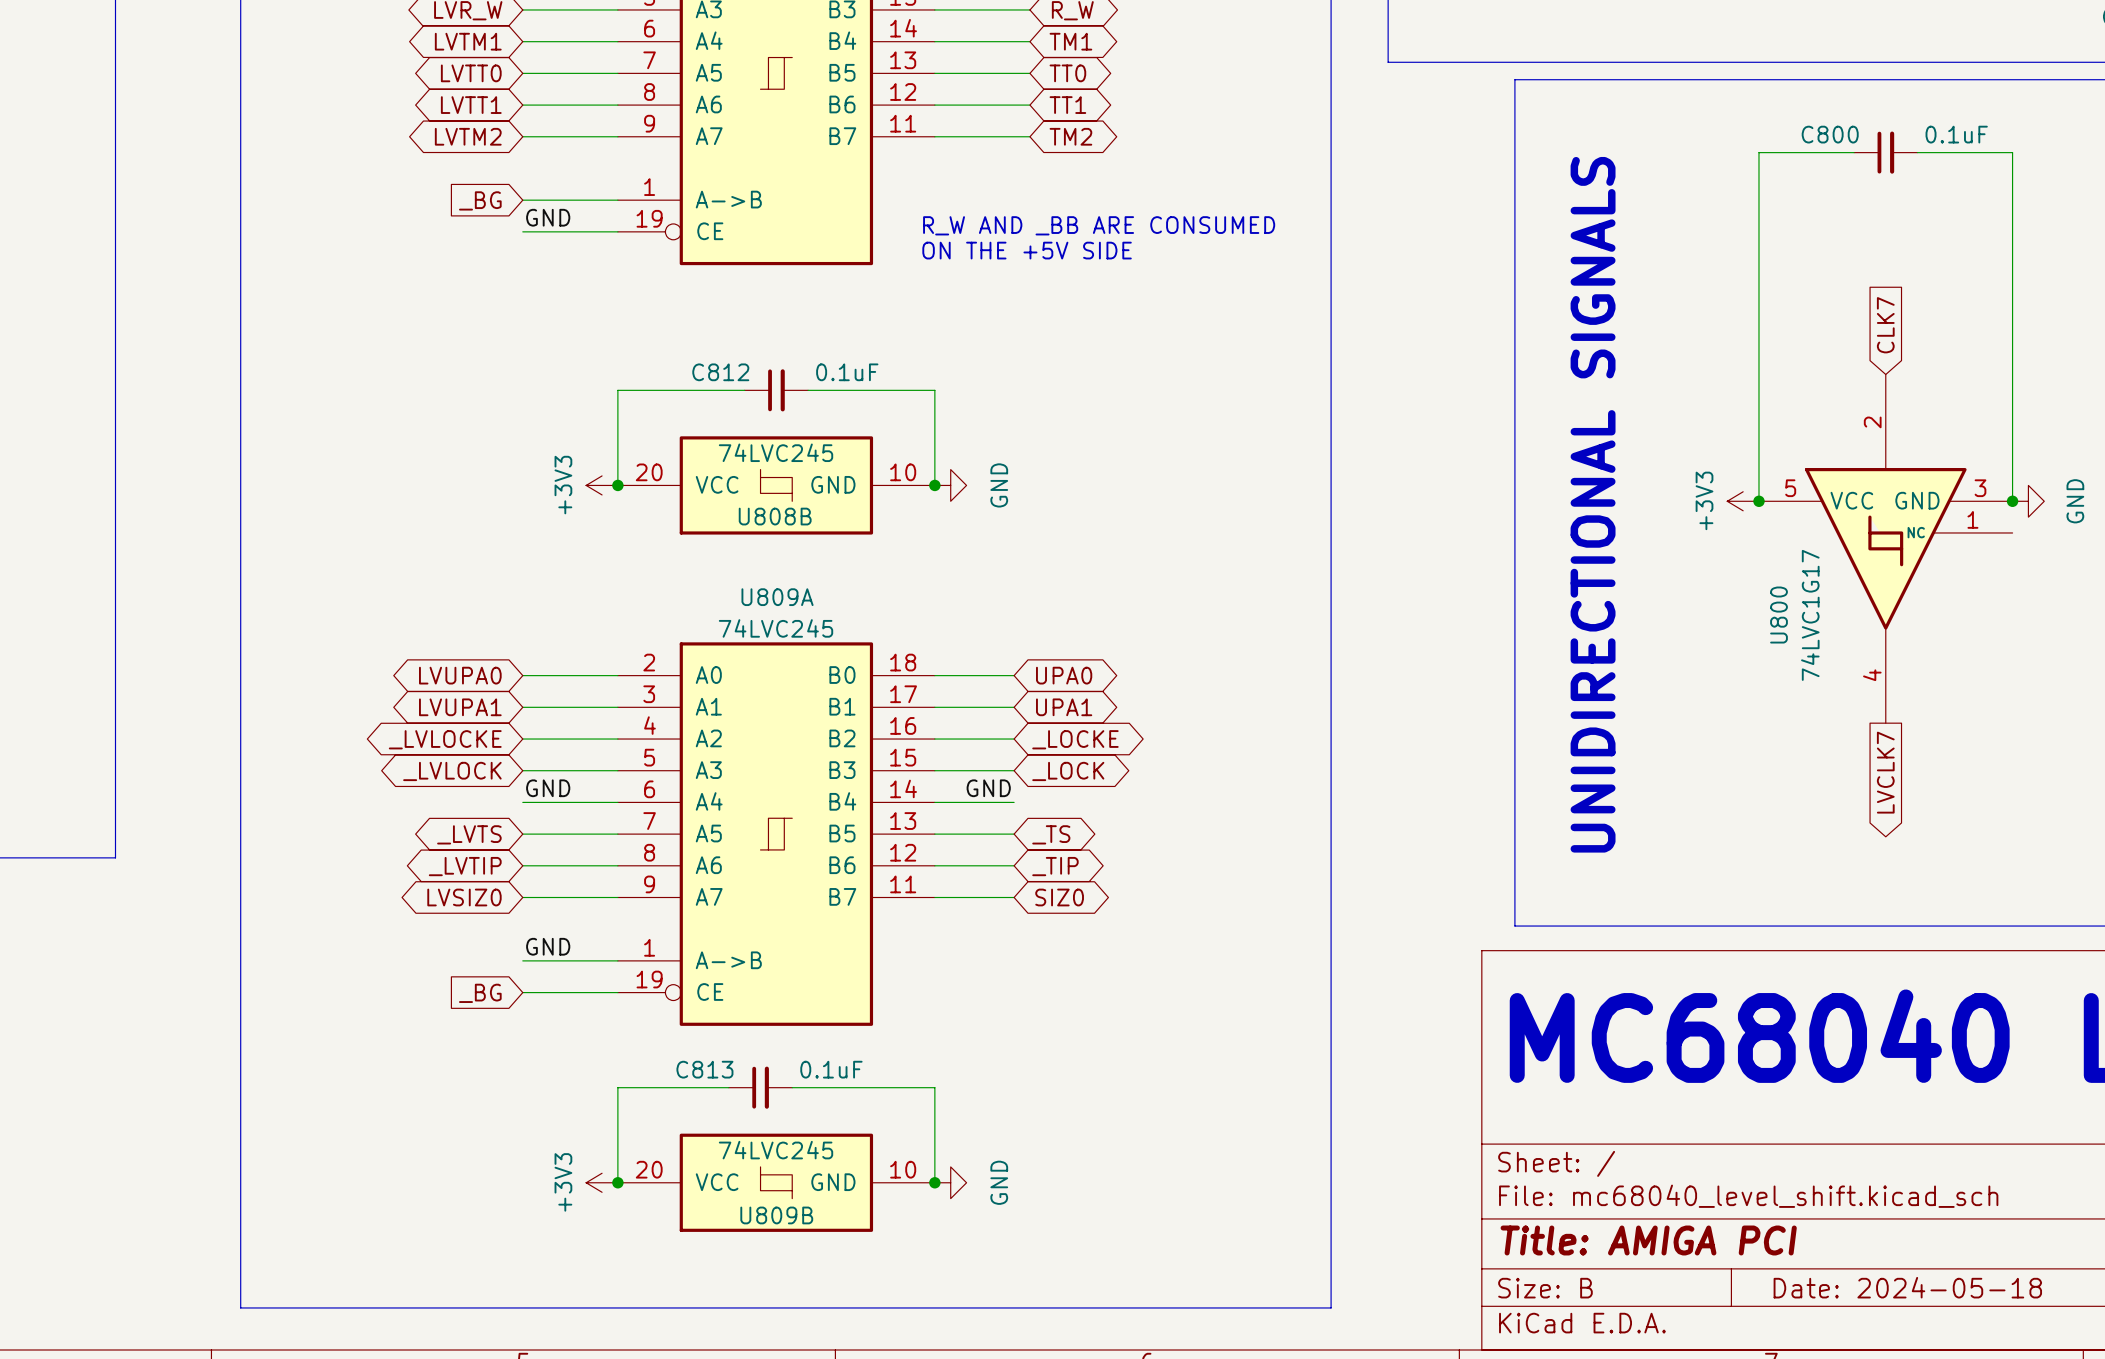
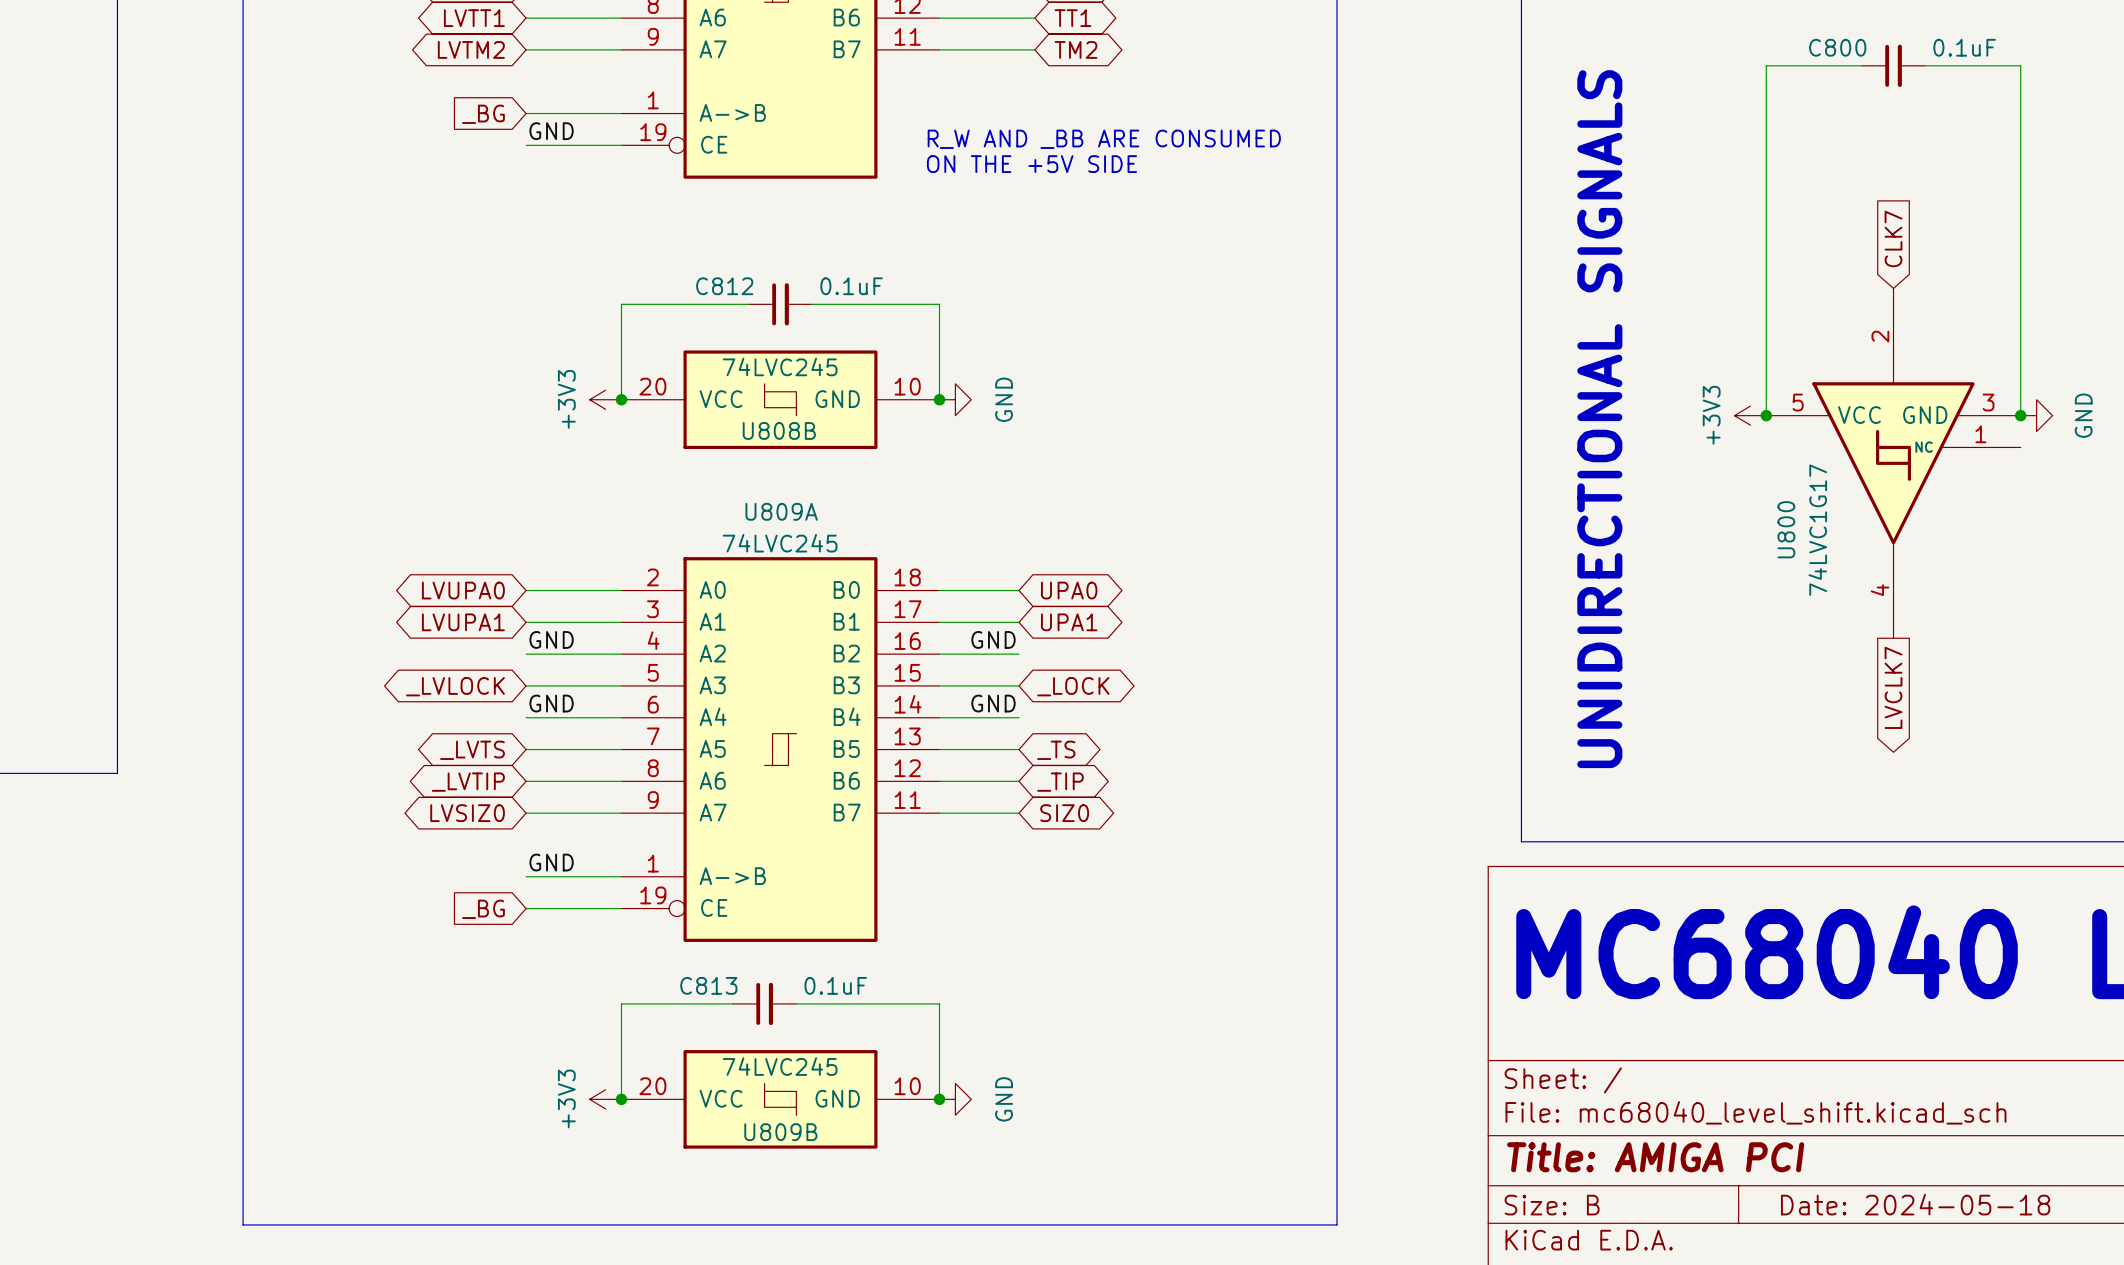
label: none -> GND (551, 639)
label: none -> GND (993, 639)
global label: _LVLOCKE (445, 739) -> none
global label: _LOCKE (1075, 739) -> none

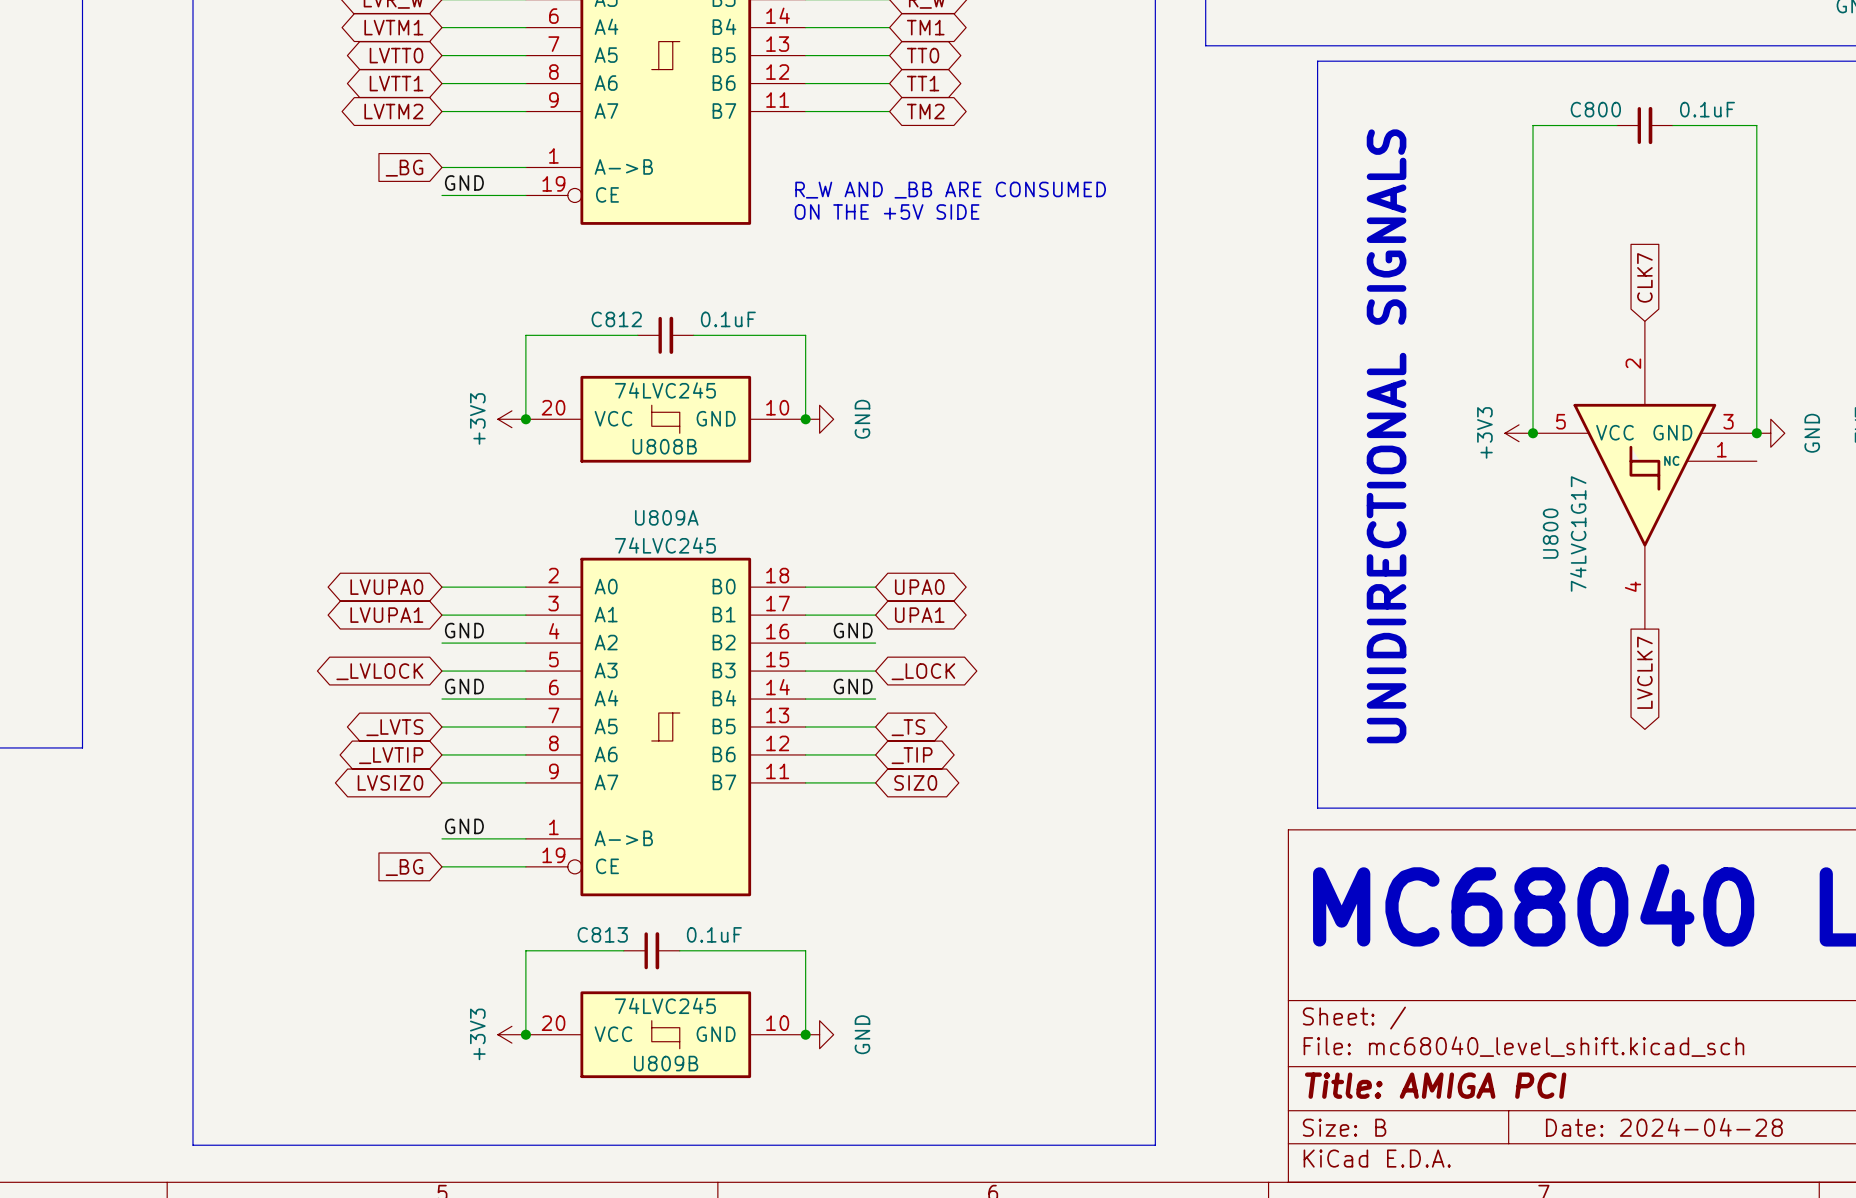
title block: Date: 2024-05-18 (1915, 1204) -> Date: 2024-04-28 (1664, 1127)

